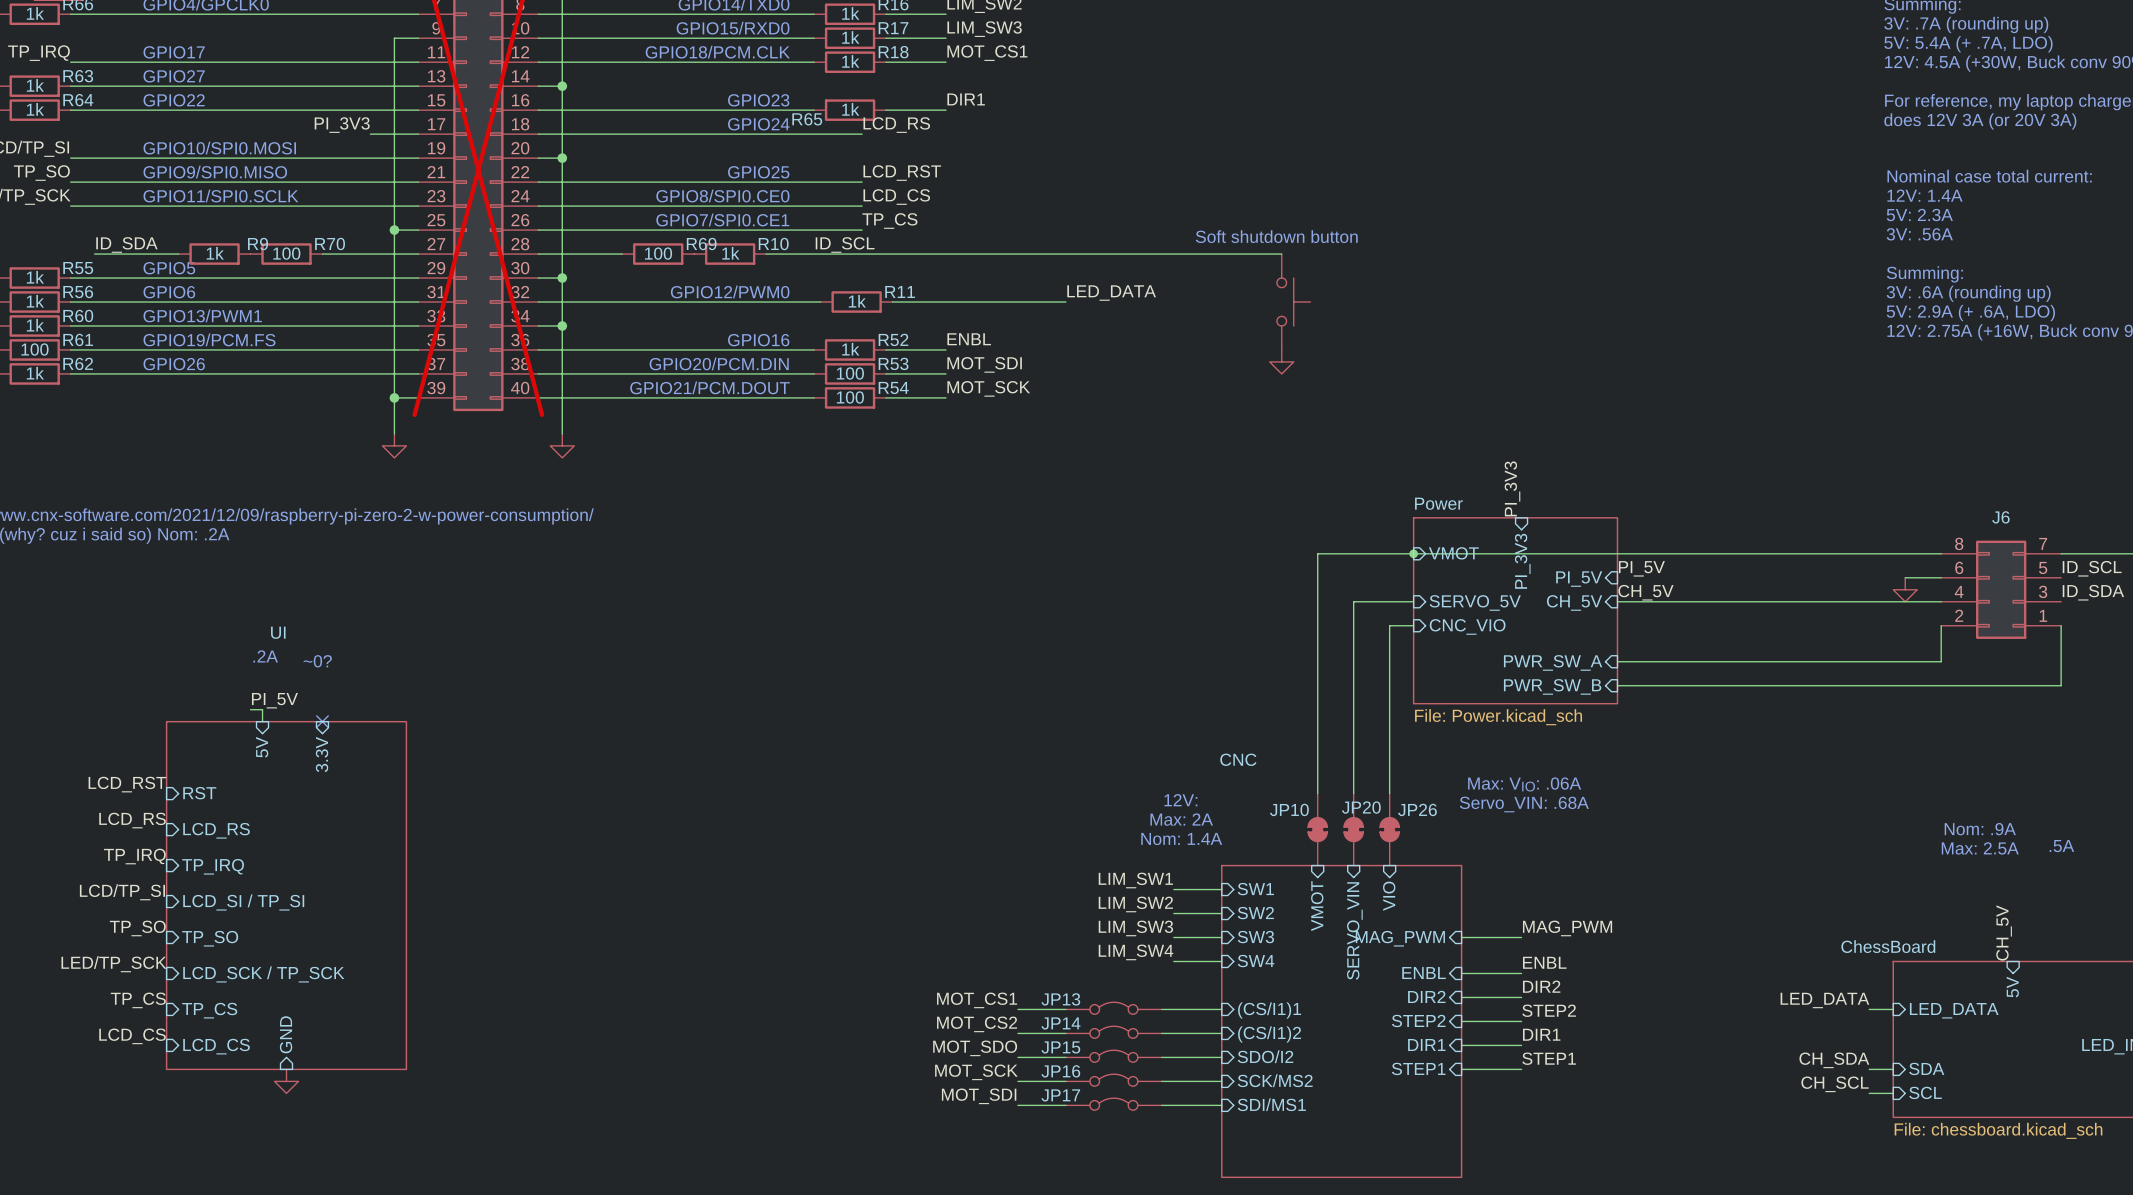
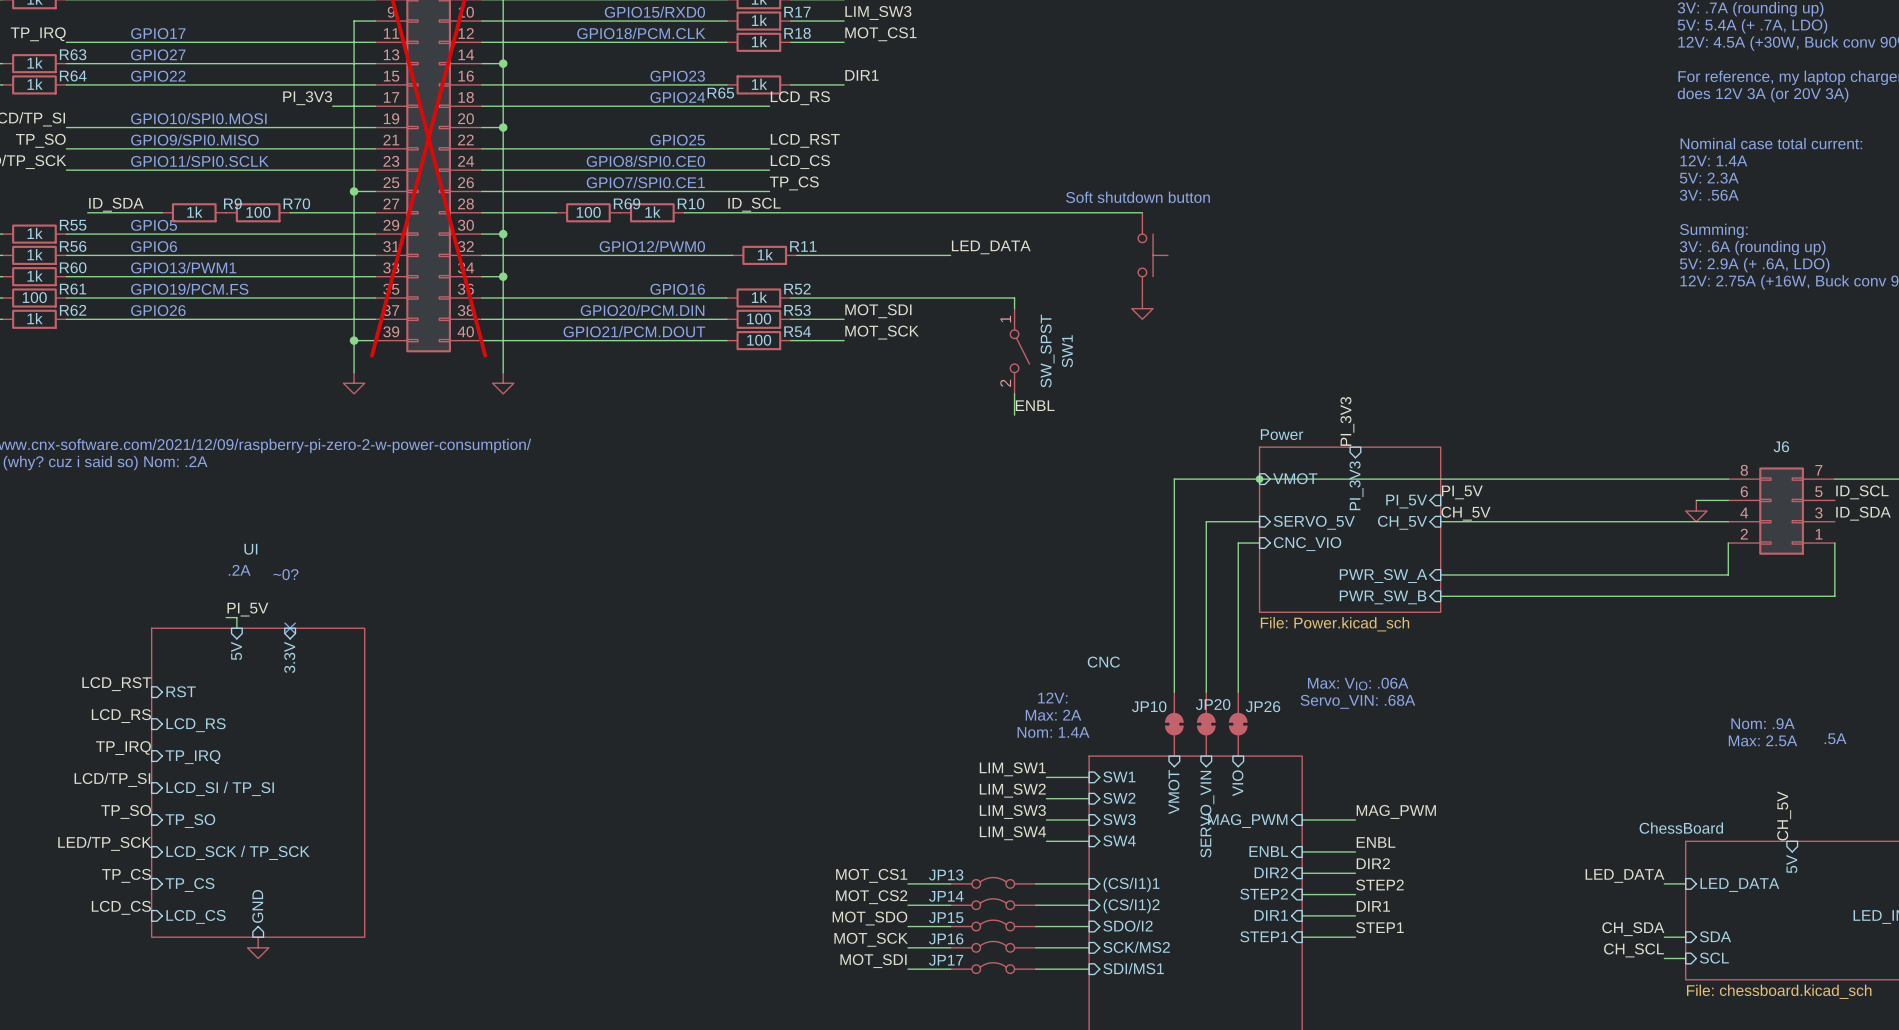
label position: ENBL (969, 339) -> ENBL (1035, 405)
wire: none -> (844, 298) (1014, 298) (1014, 308)
SW1: none -> SW_SPST (1019, 351)
wire: none -> (1014, 393) (1014, 415)

